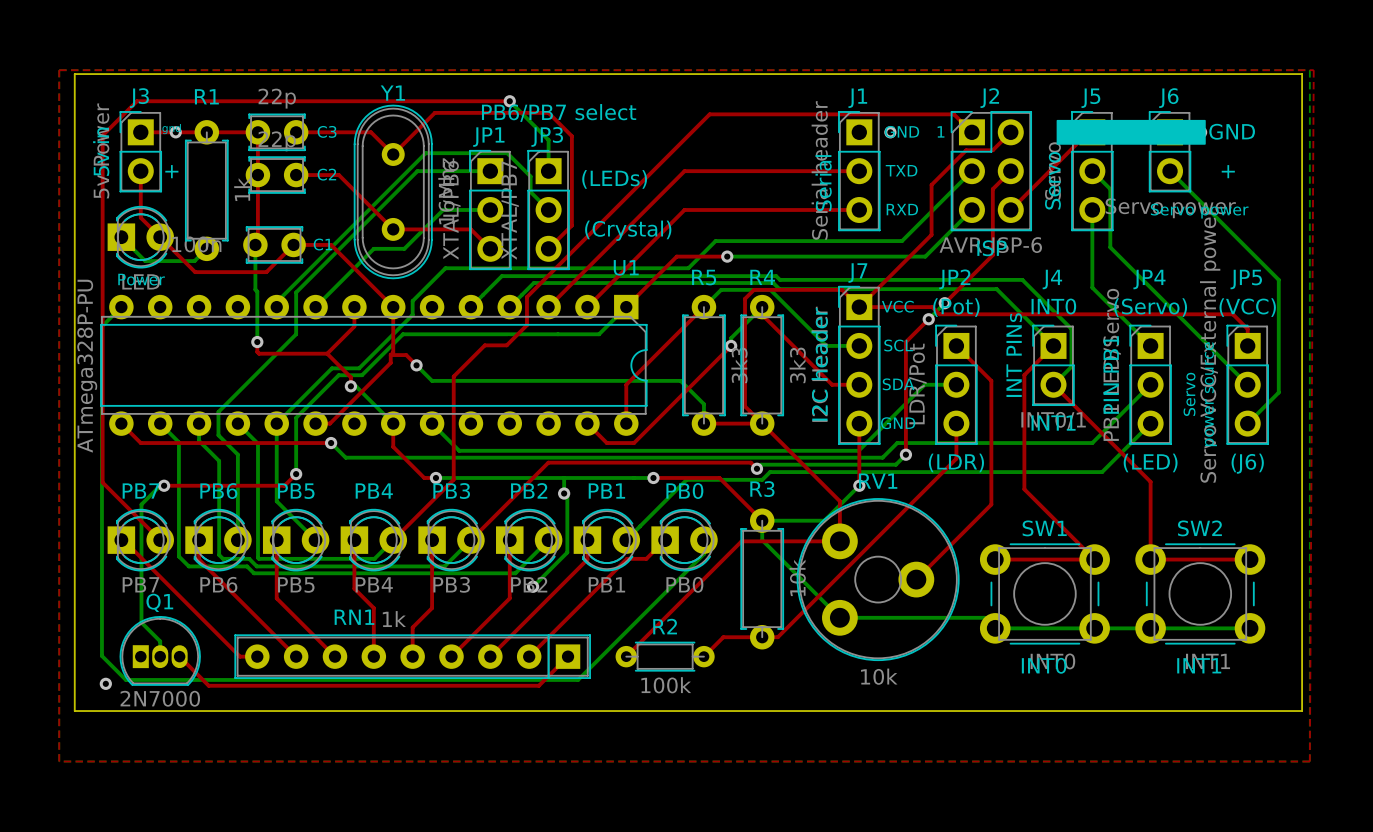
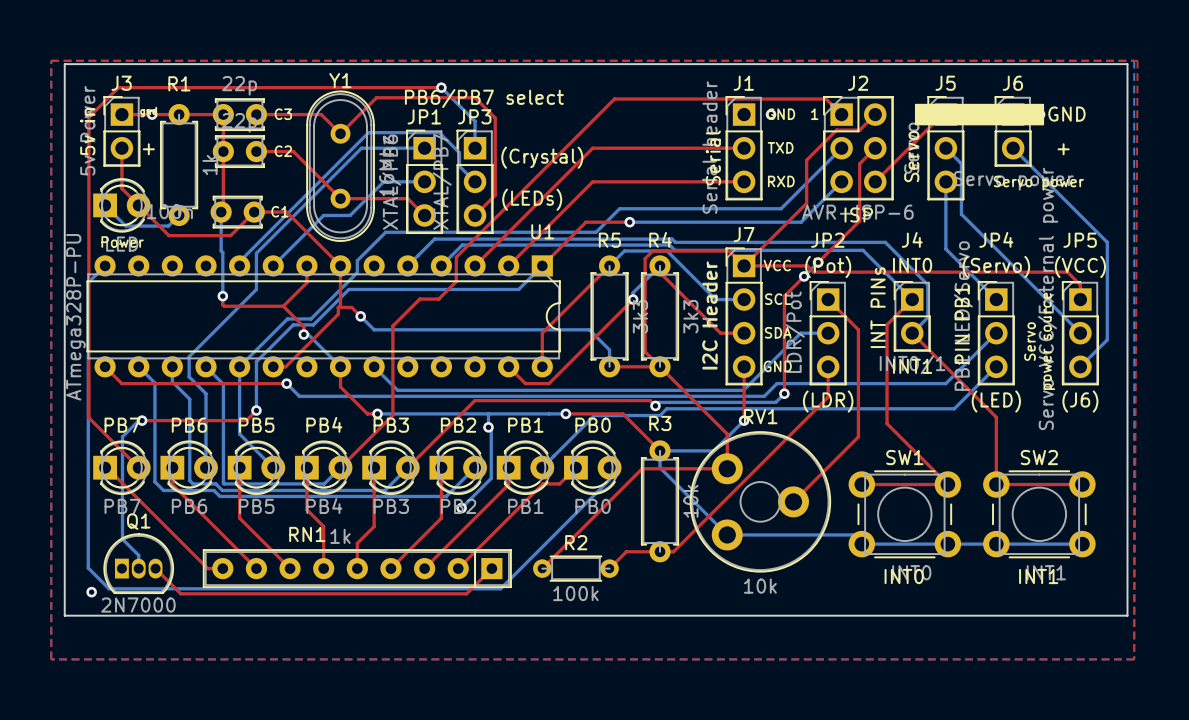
text position: (LEDs) (614, 179) -> (LEDs) (532, 199)
text position: (Crystal) (628, 230) -> (Crystal) (542, 157)

